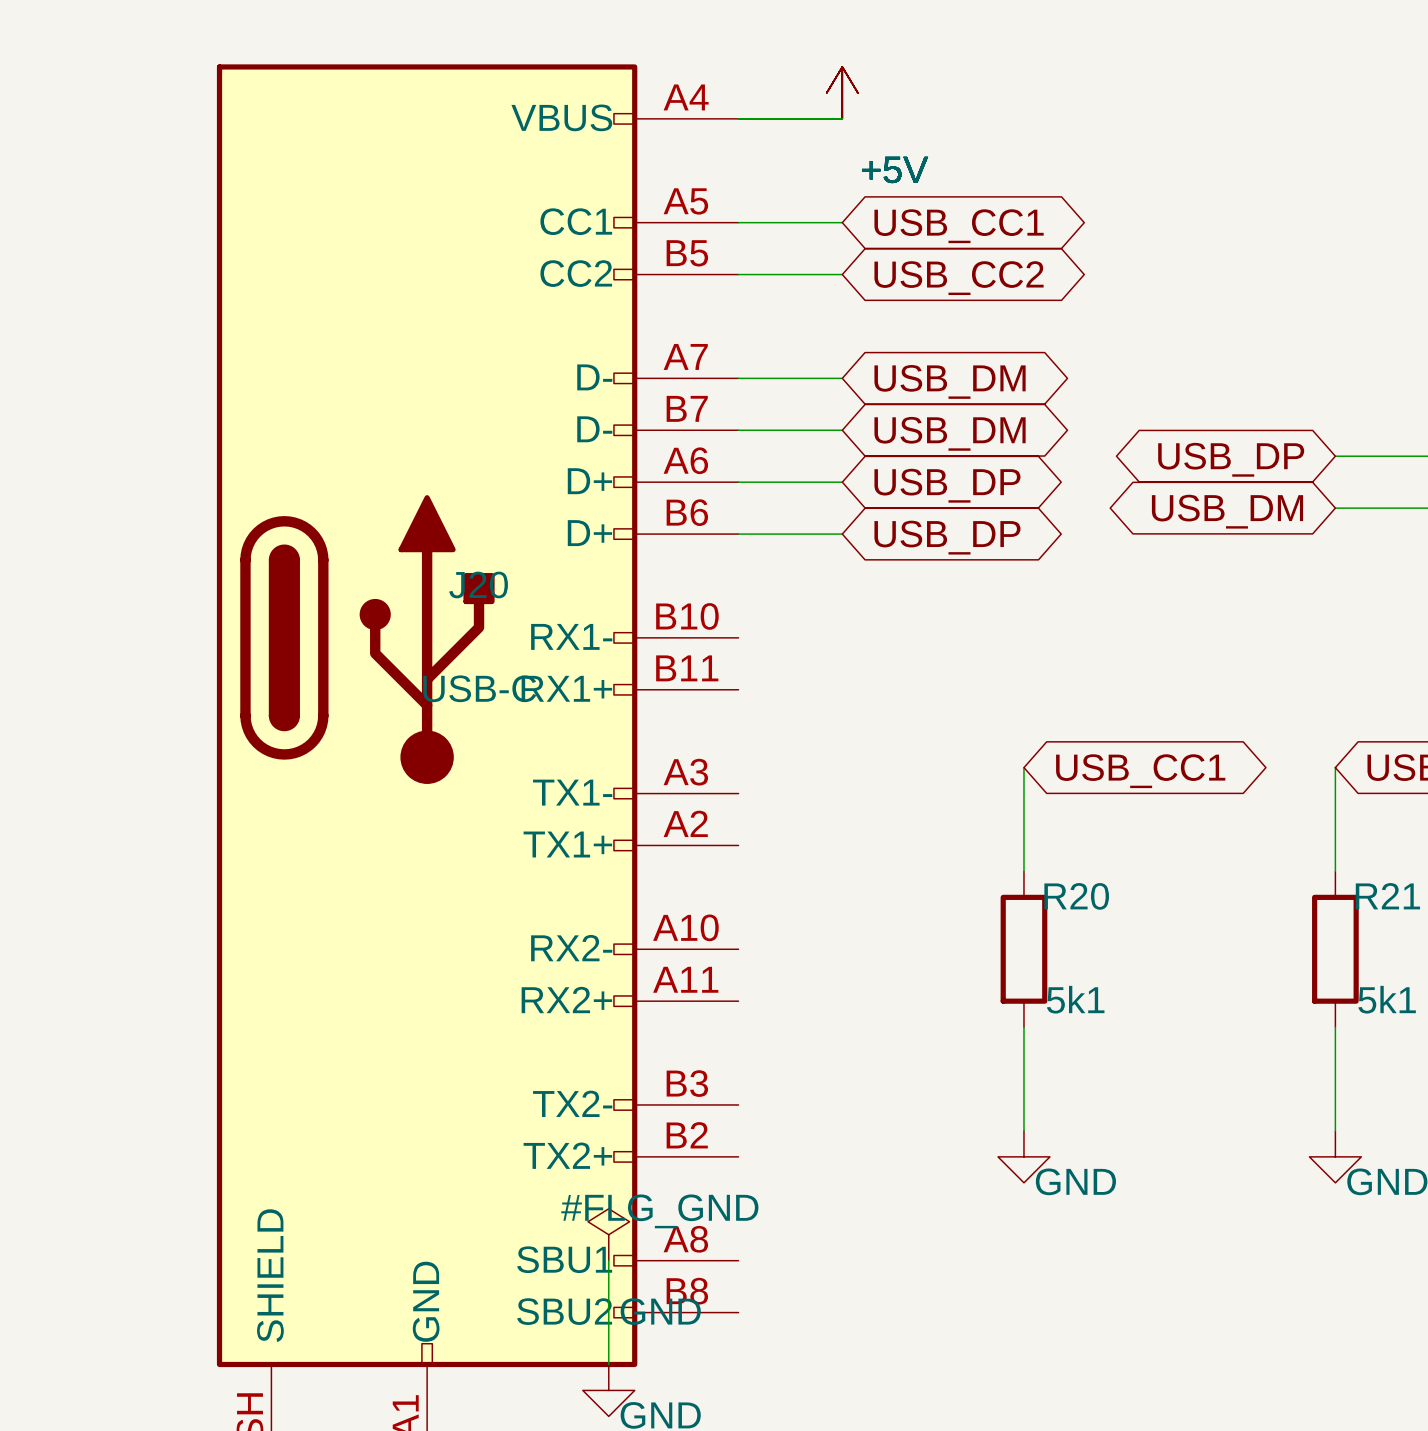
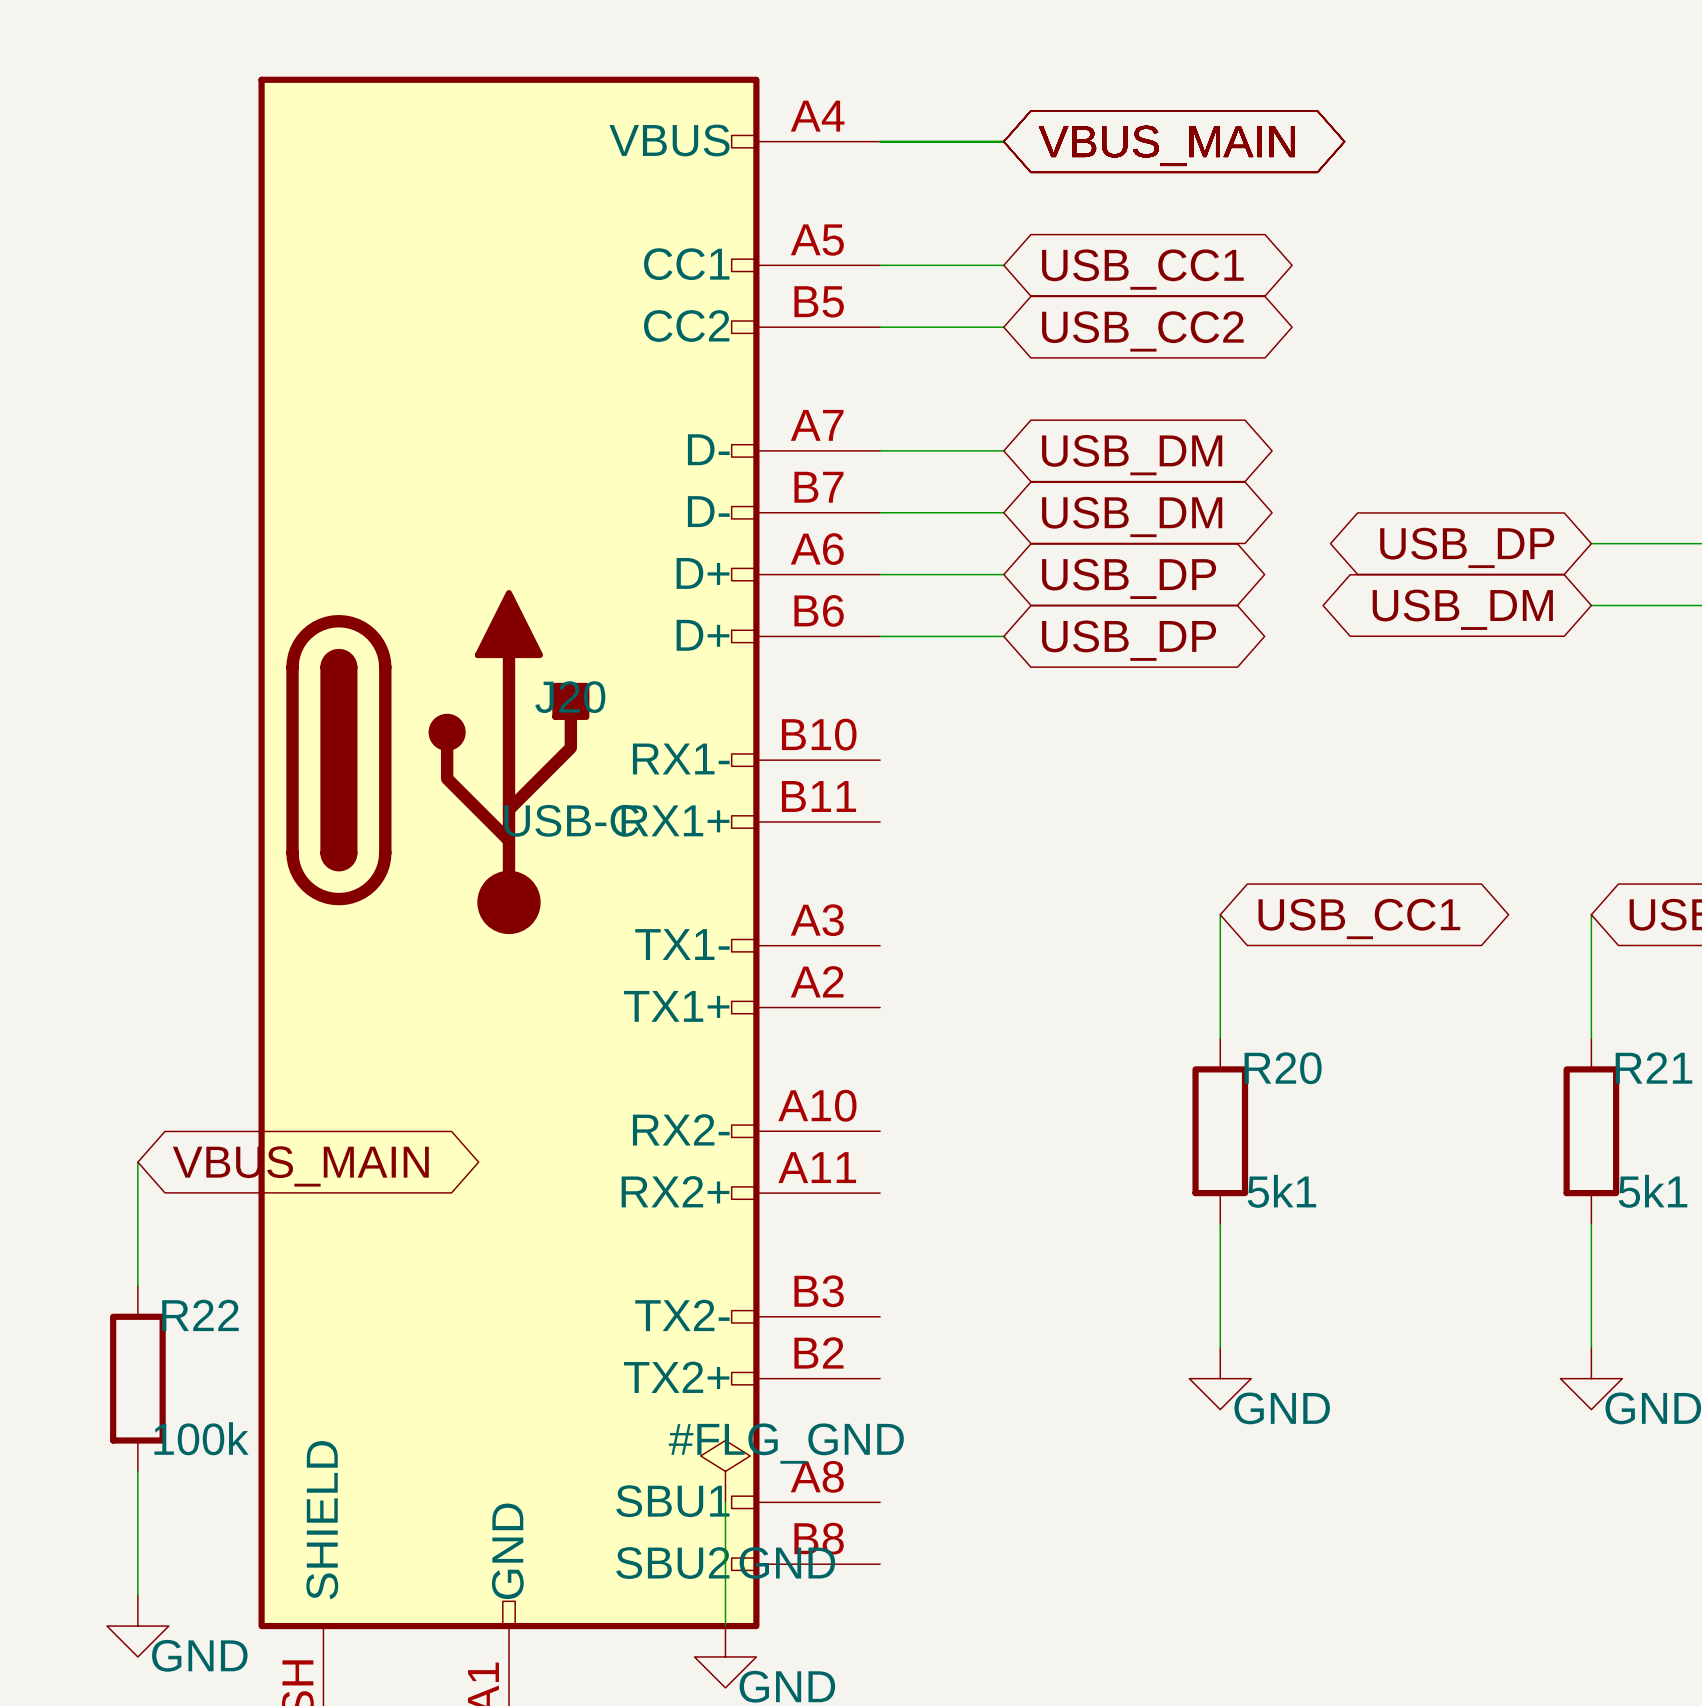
power symbol: +5V (842, 92) -> none
global label: none -> VBUS_MAIN (1166, 145)
wire: none -> (137, 1162) (137, 1285)
global label: none -> VBUS_MAIN (300, 1166)
R22: none -> 100k (137, 1378)
wire: none -> (137, 1471) (137, 1595)
power symbol: none -> GND (137, 1626)

